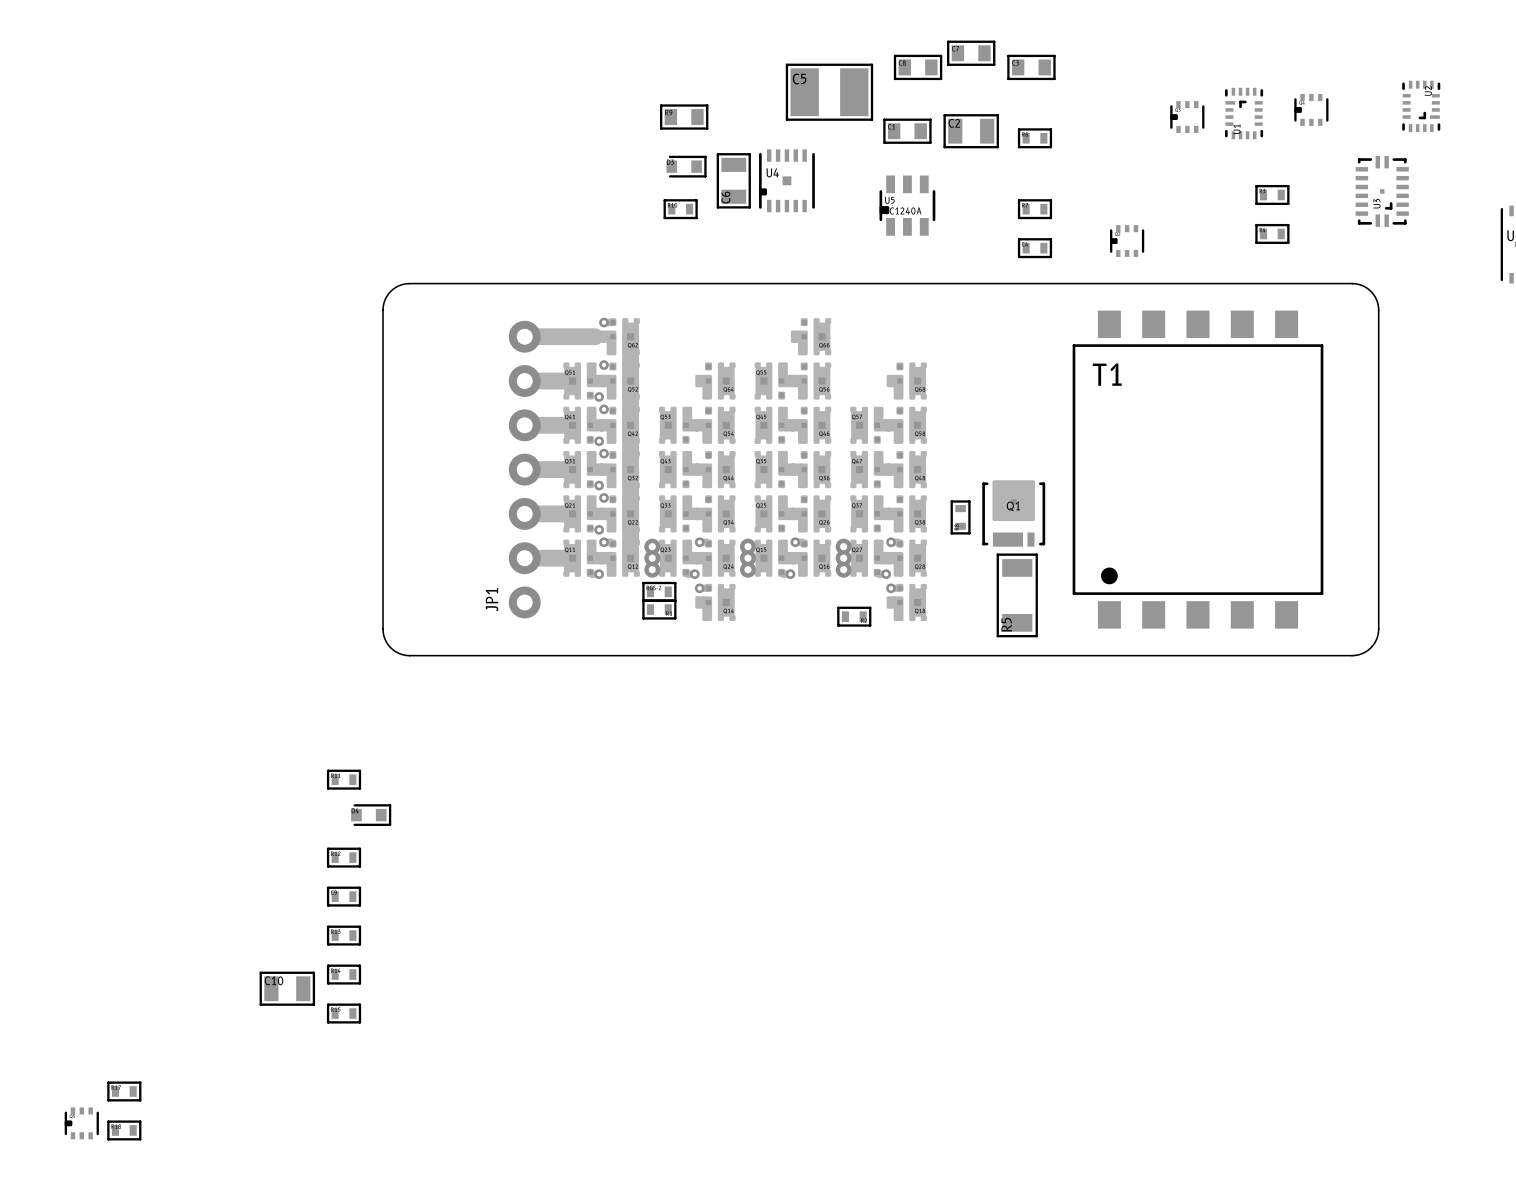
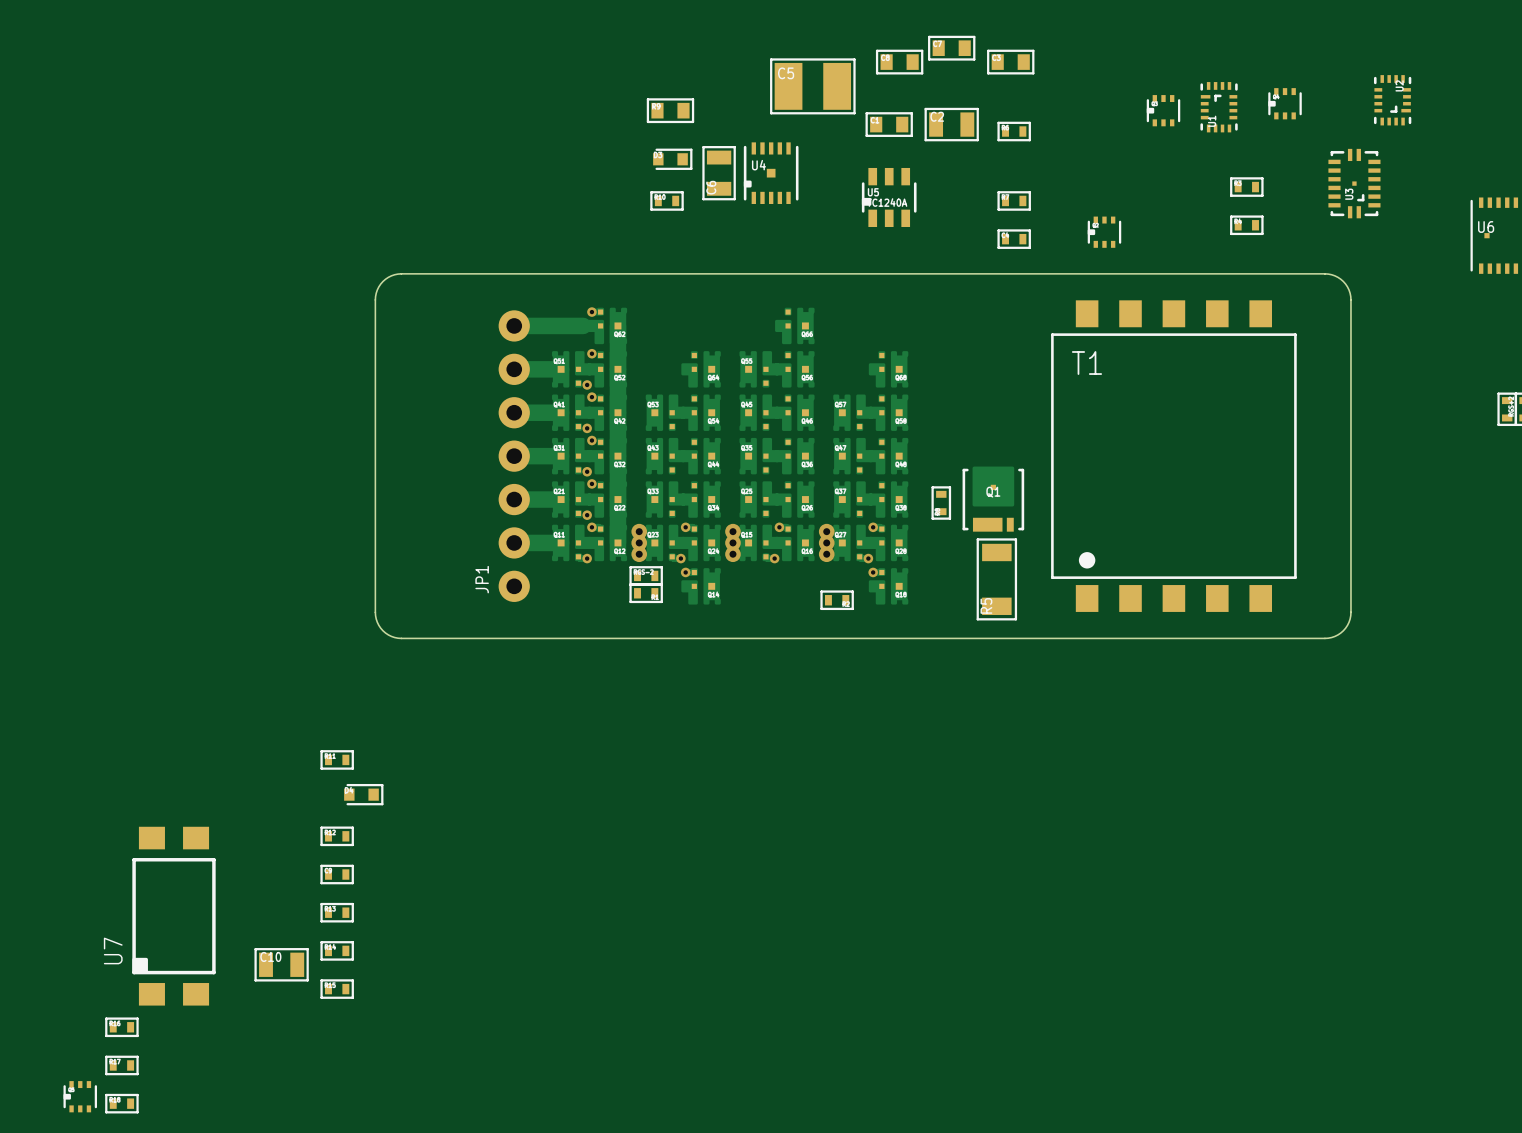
U7: none -> (173, 916)
part: none -> (121, 1027)

